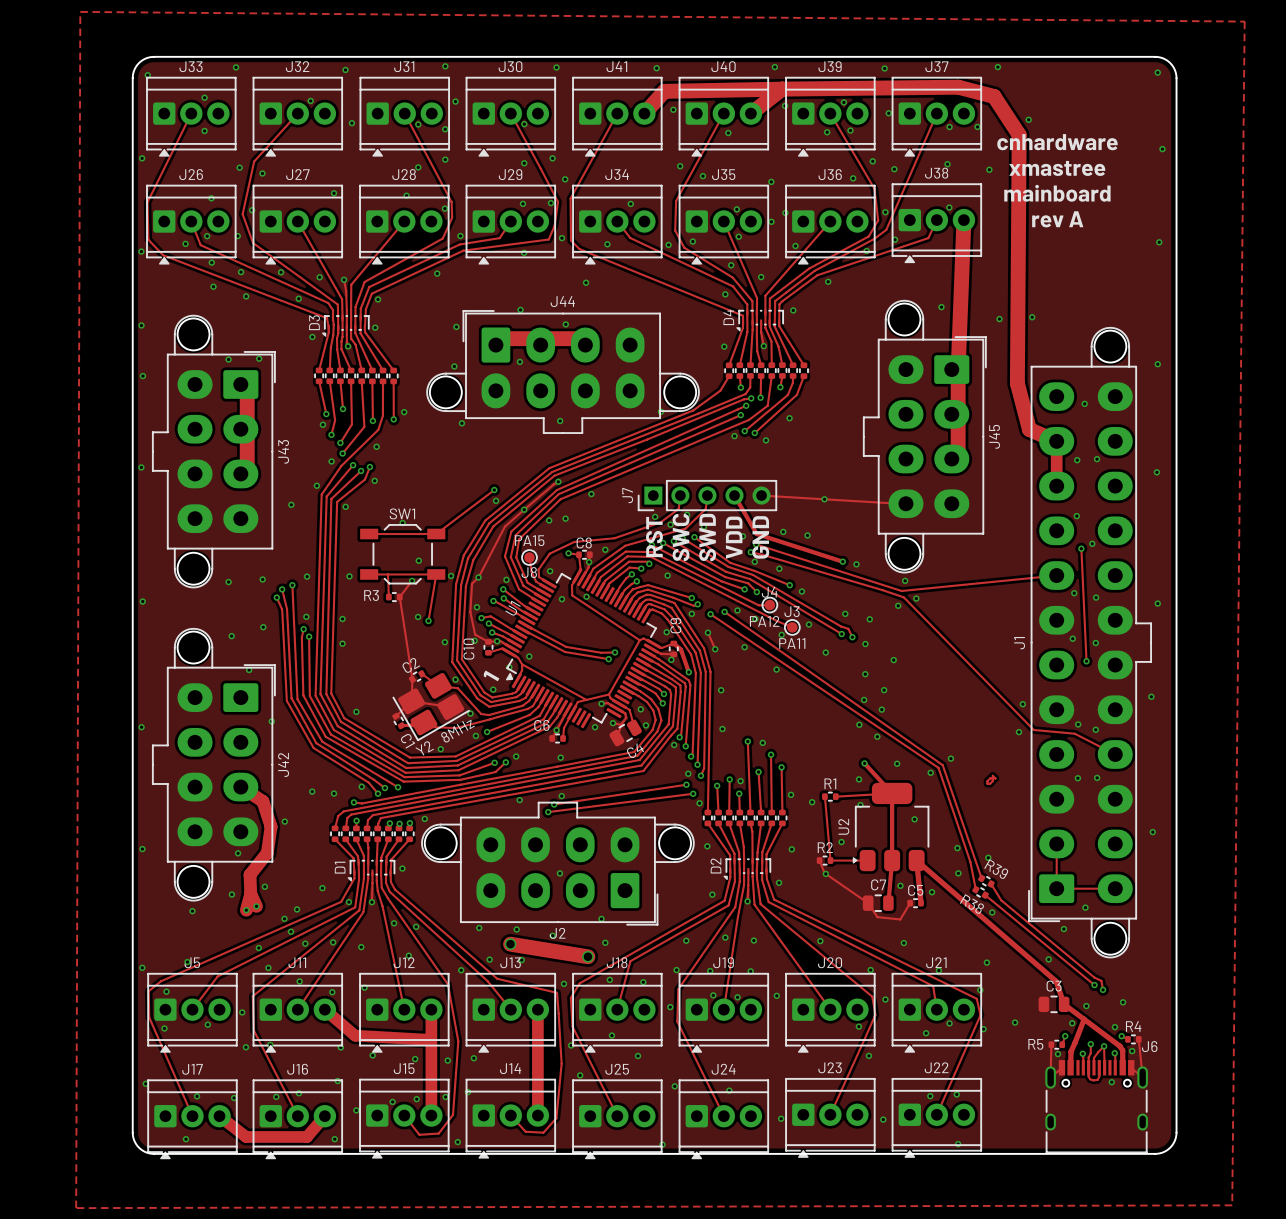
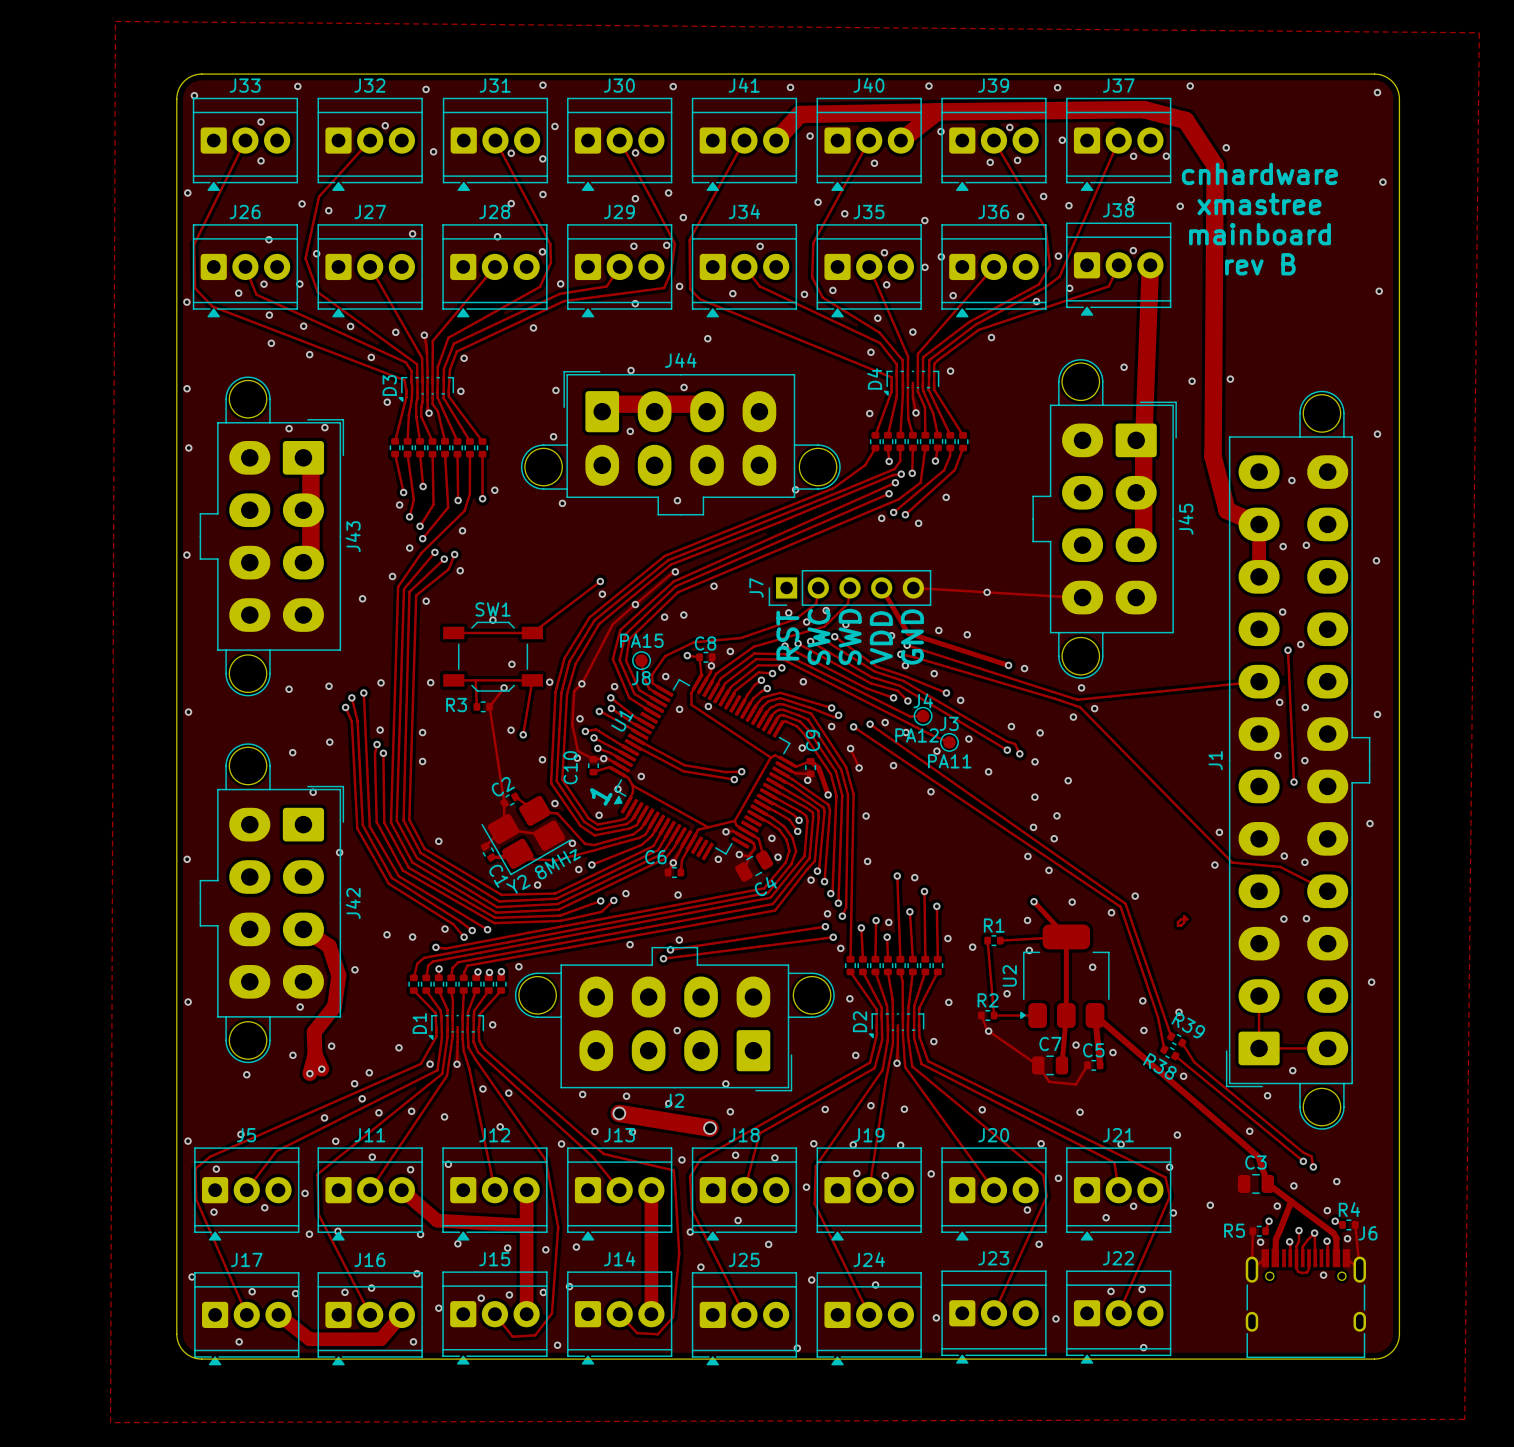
text: rev A (1057, 219) -> rev B (1260, 264)

